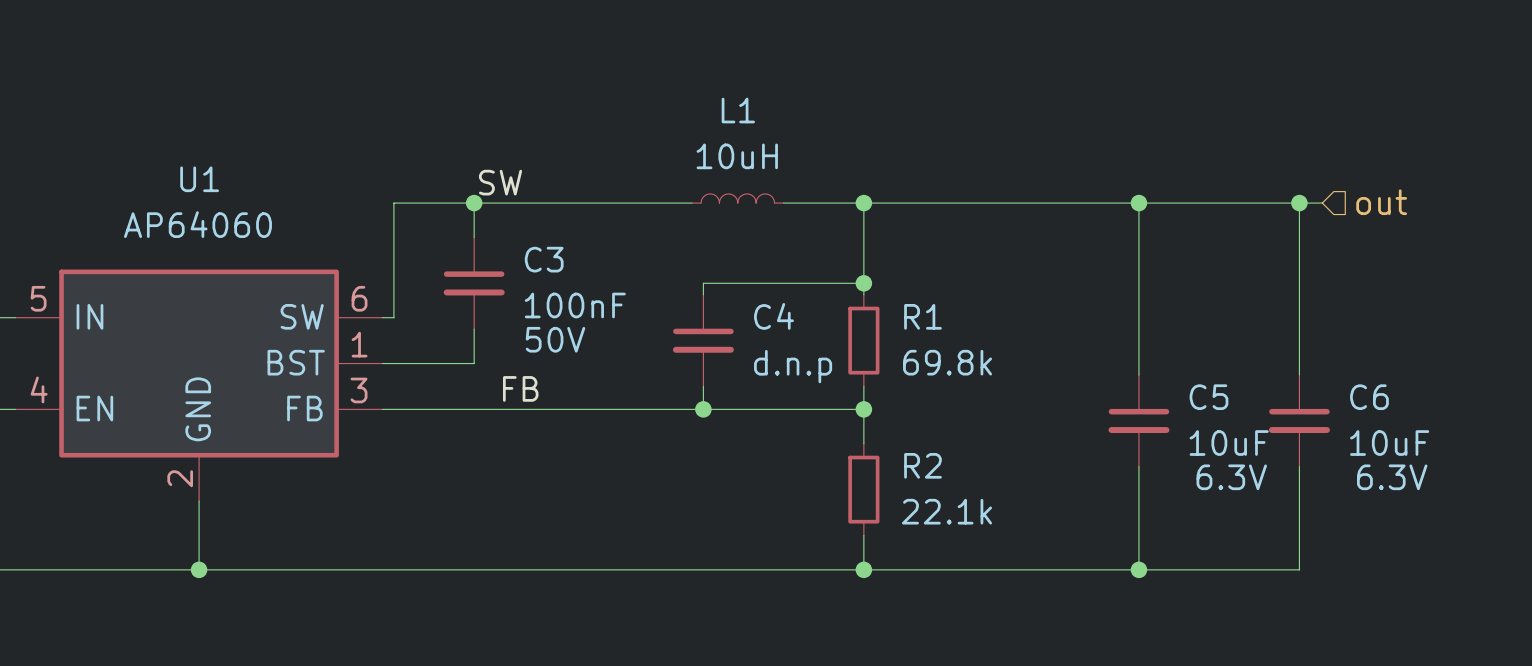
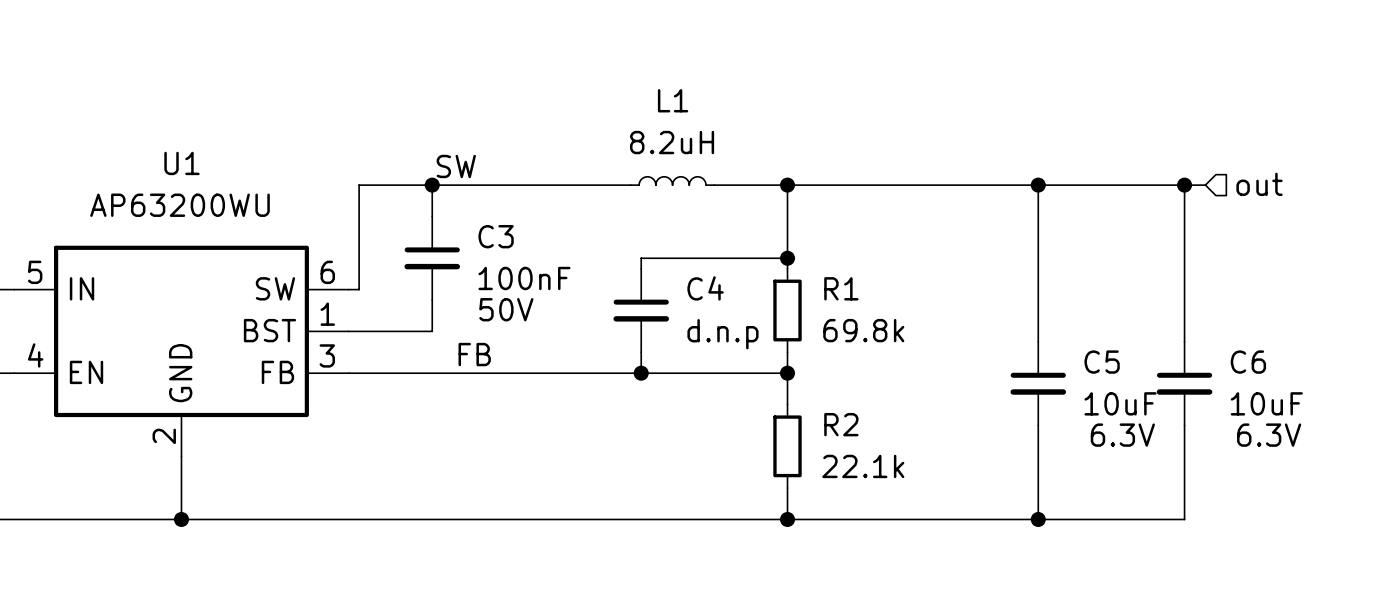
L1 value: 10uH (737, 156) -> 8.2uH (672, 142)
U1 value: AP64060 (197, 224) -> AP63200WU (179, 205)

